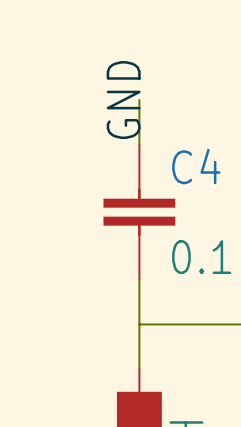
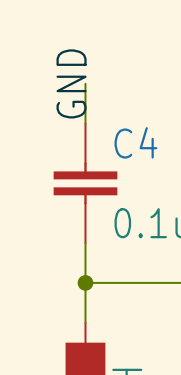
junction: none -> (85, 282)

